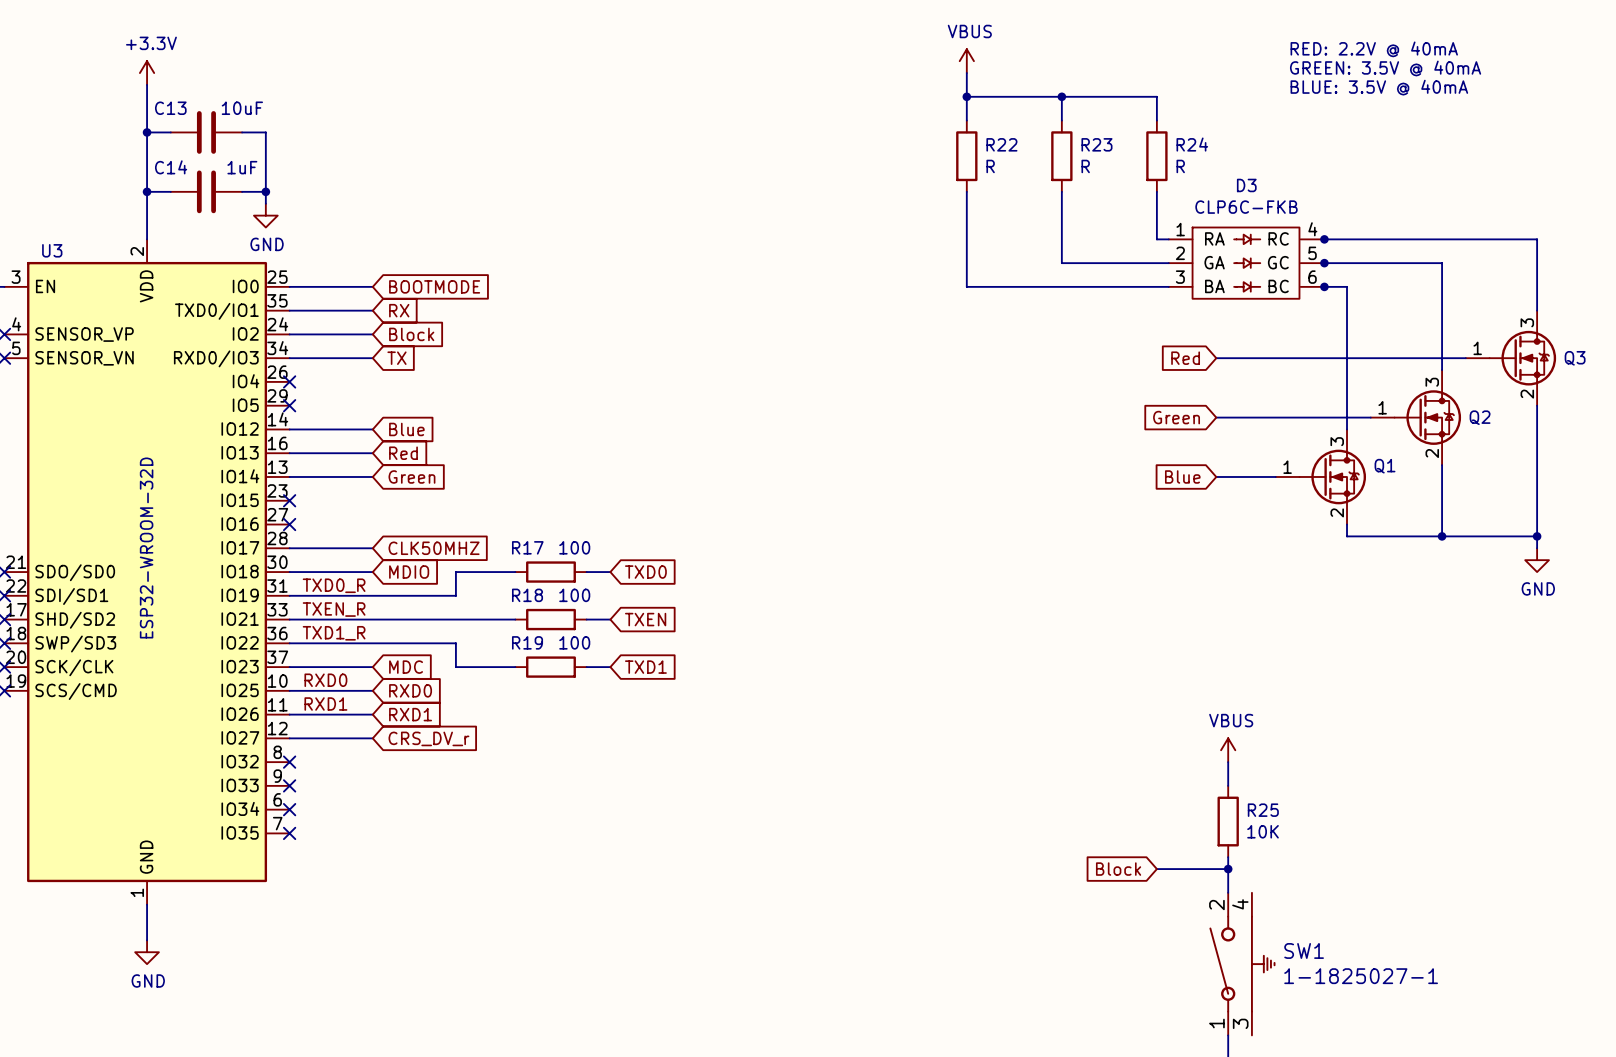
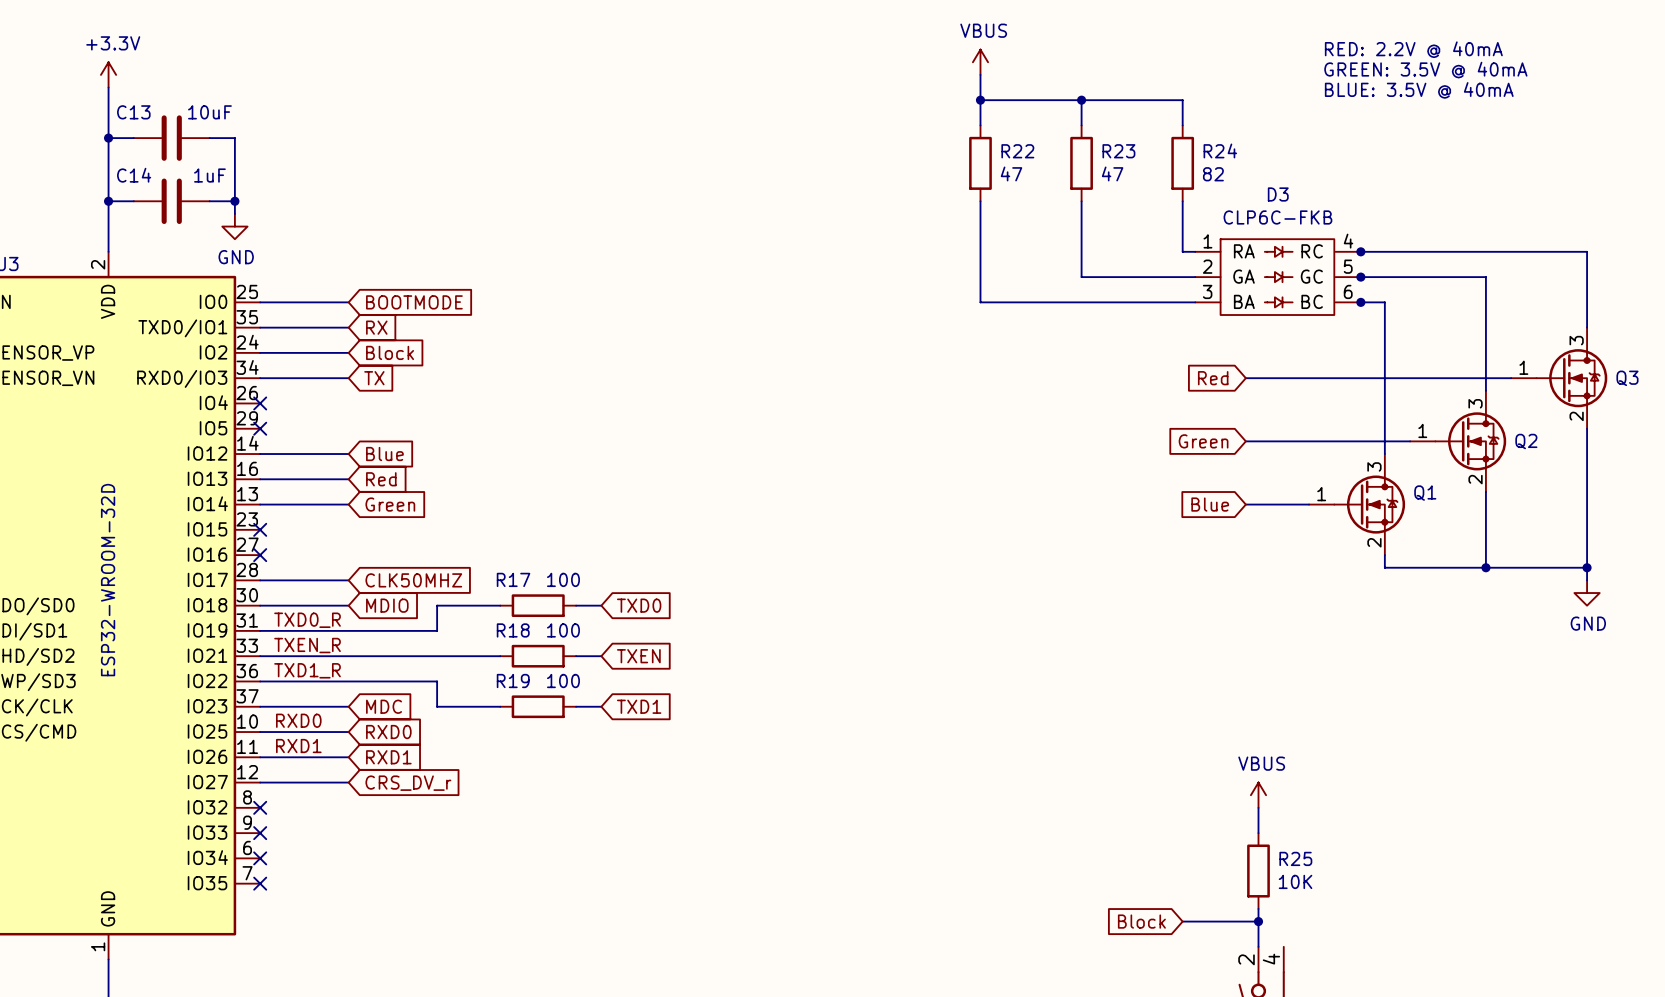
R22 value: R (990, 166) -> 47 (1011, 173)
R23 value: R (1085, 166) -> 47 (1112, 173)
R24 value: R (1180, 166) -> 82 (1213, 174)

